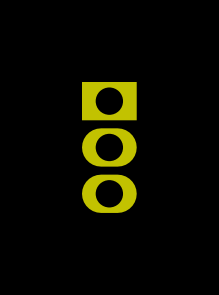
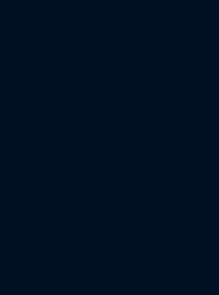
part: (109, 147) -> none

